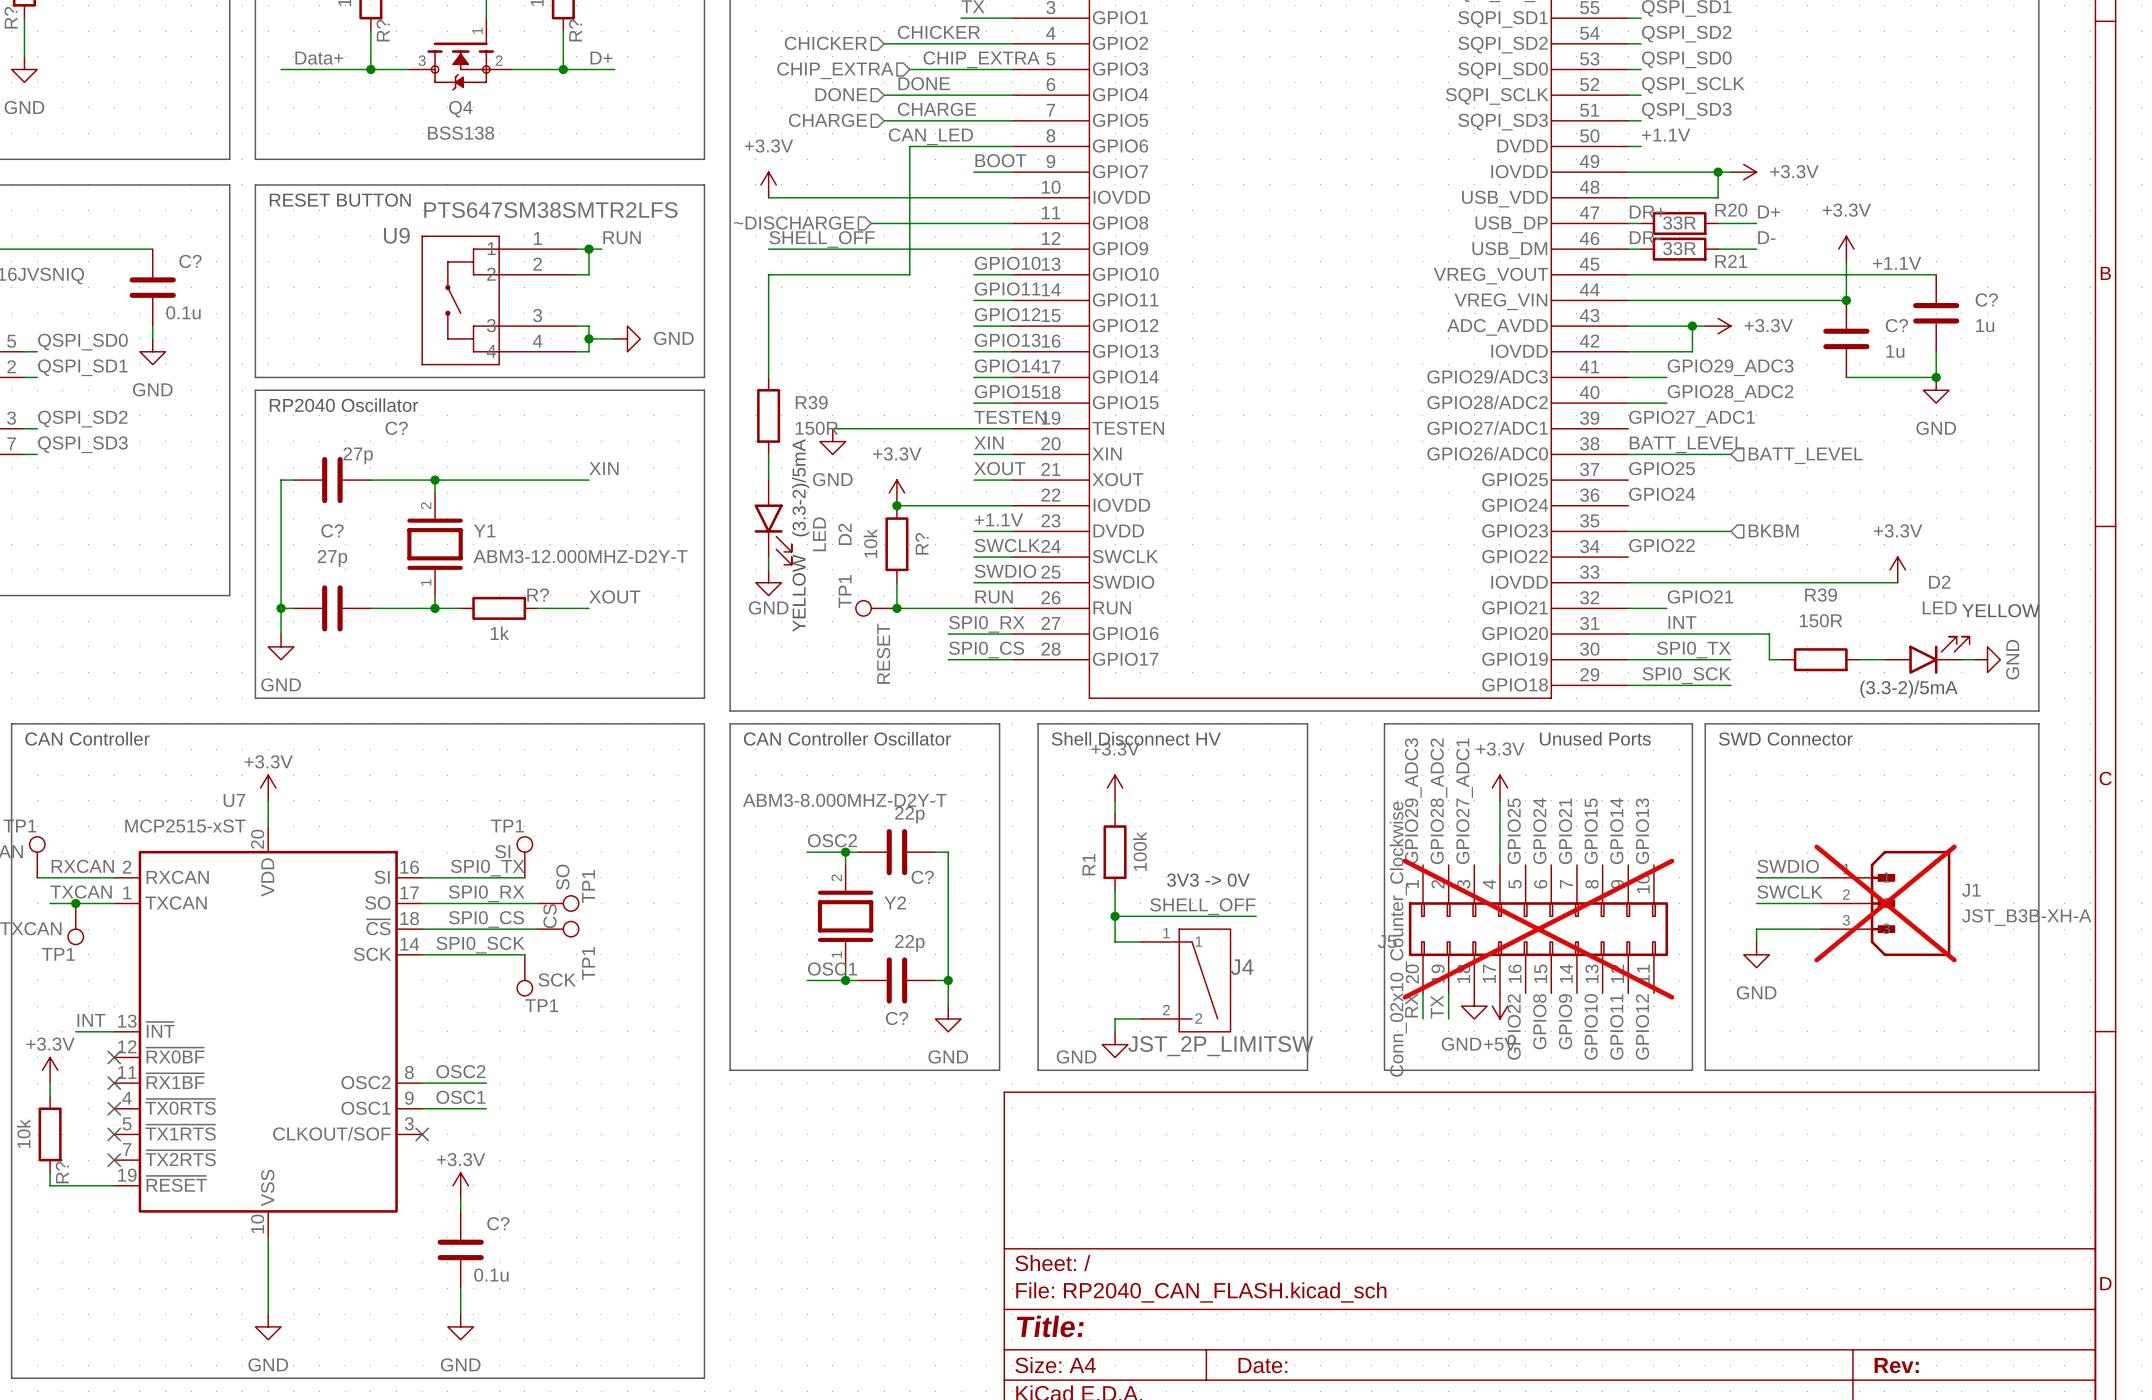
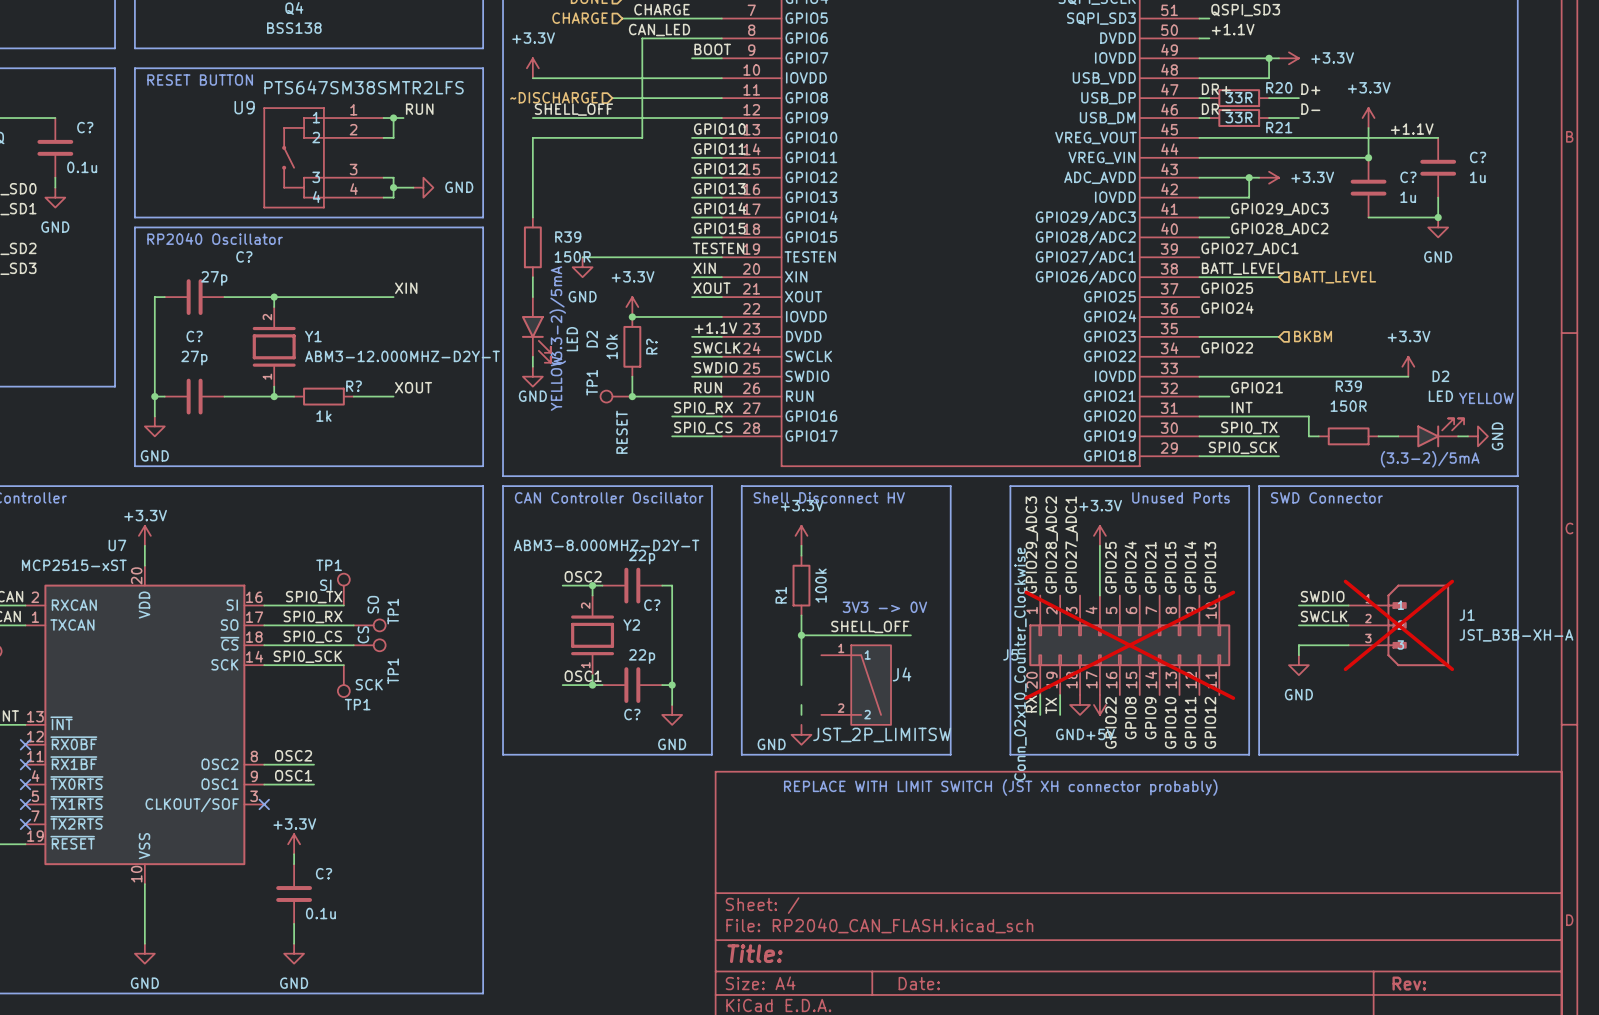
wire: (1115, 941) (1140, 941) -> (801, 655) (801, 685)
wire: none -> (801, 704) (801, 714)
wire: (1140, 1018) (1115, 1018) (1115, 1031) -> none
text: none -> REPLACE WITH LIMIT SWITCH (JST XH connector probably) (1000, 787)

